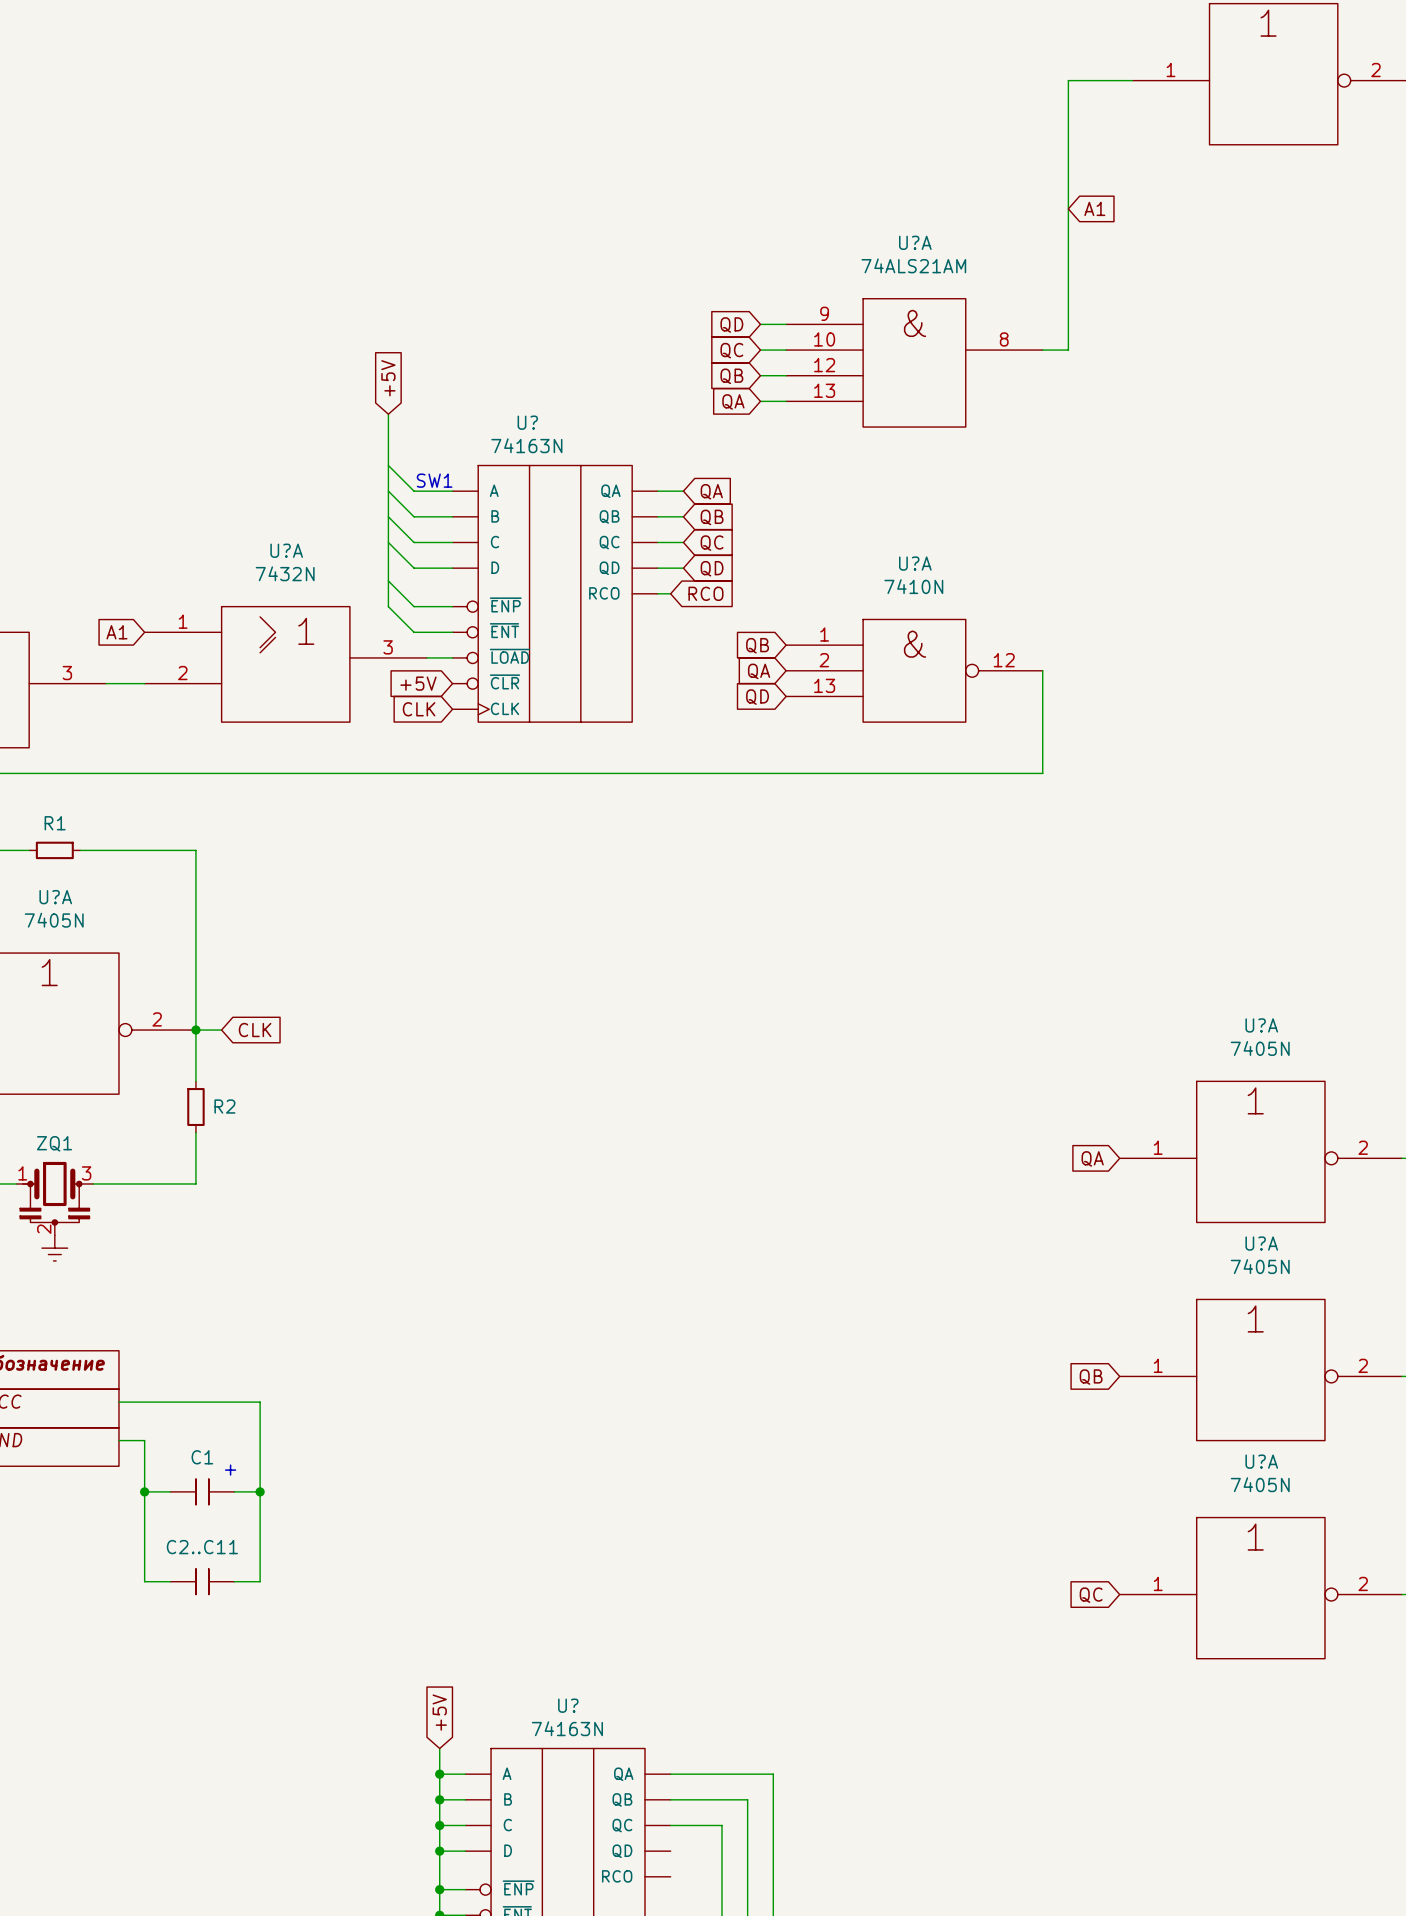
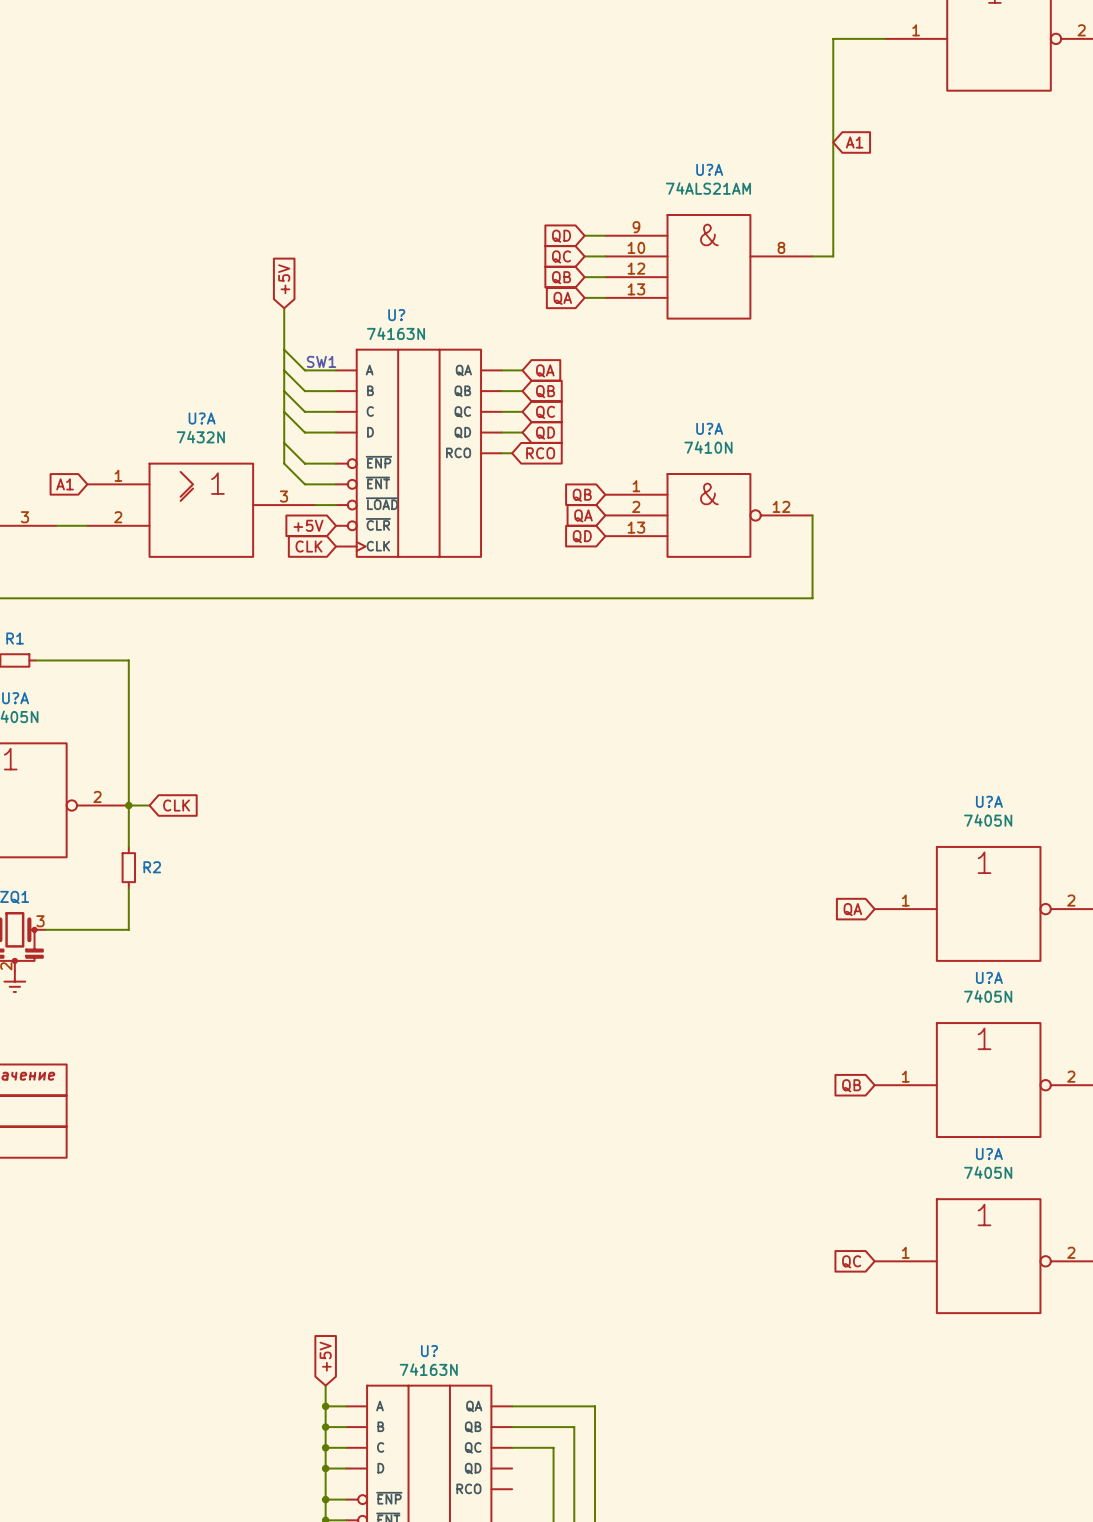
wire: (118, 1402) (260, 1402) (260, 1581) (234, 1581) -> none
wire: (118, 1440) (144, 1440) (144, 1581) (170, 1581) -> none
text: + (230, 1470) -> none
wire: (144, 1491) (170, 1491) -> none
junction: (144, 1491) -> none
С1: (202, 1491) -> none
wire: (234, 1491) (260, 1491) -> none
junction: (260, 1491) -> none
С2..С11: (202, 1581) -> none

